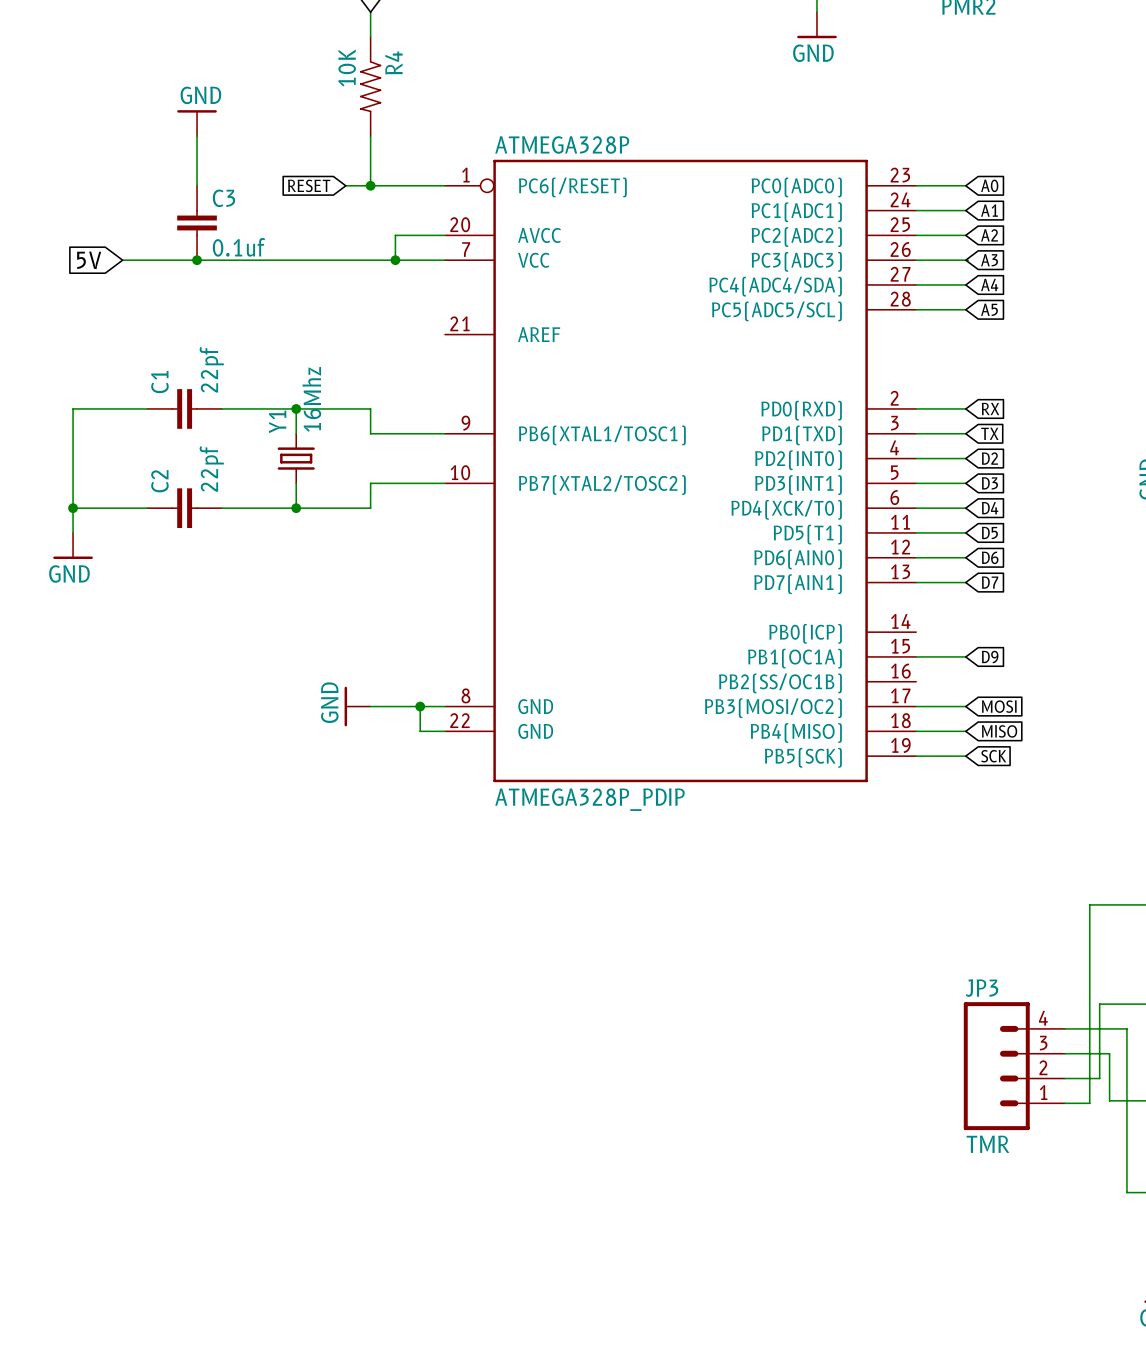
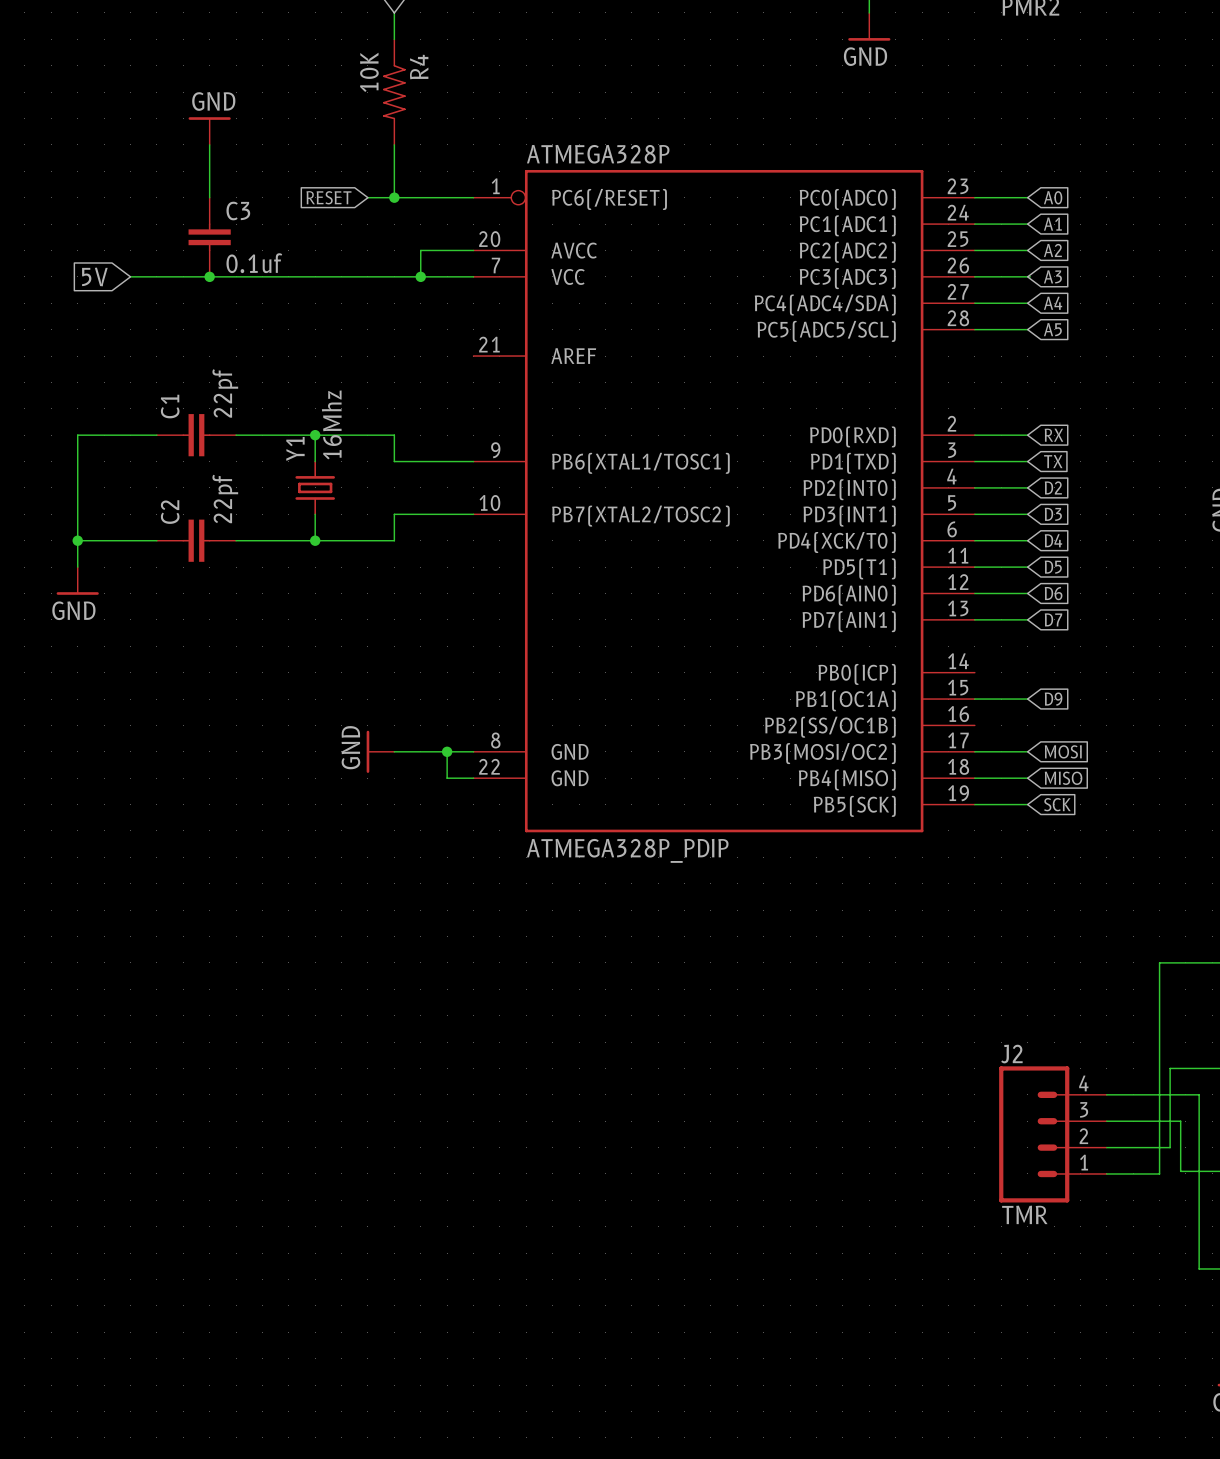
J2: none -> TMR (1052, 1134)
JP3: TMR (1014, 1066) -> none

